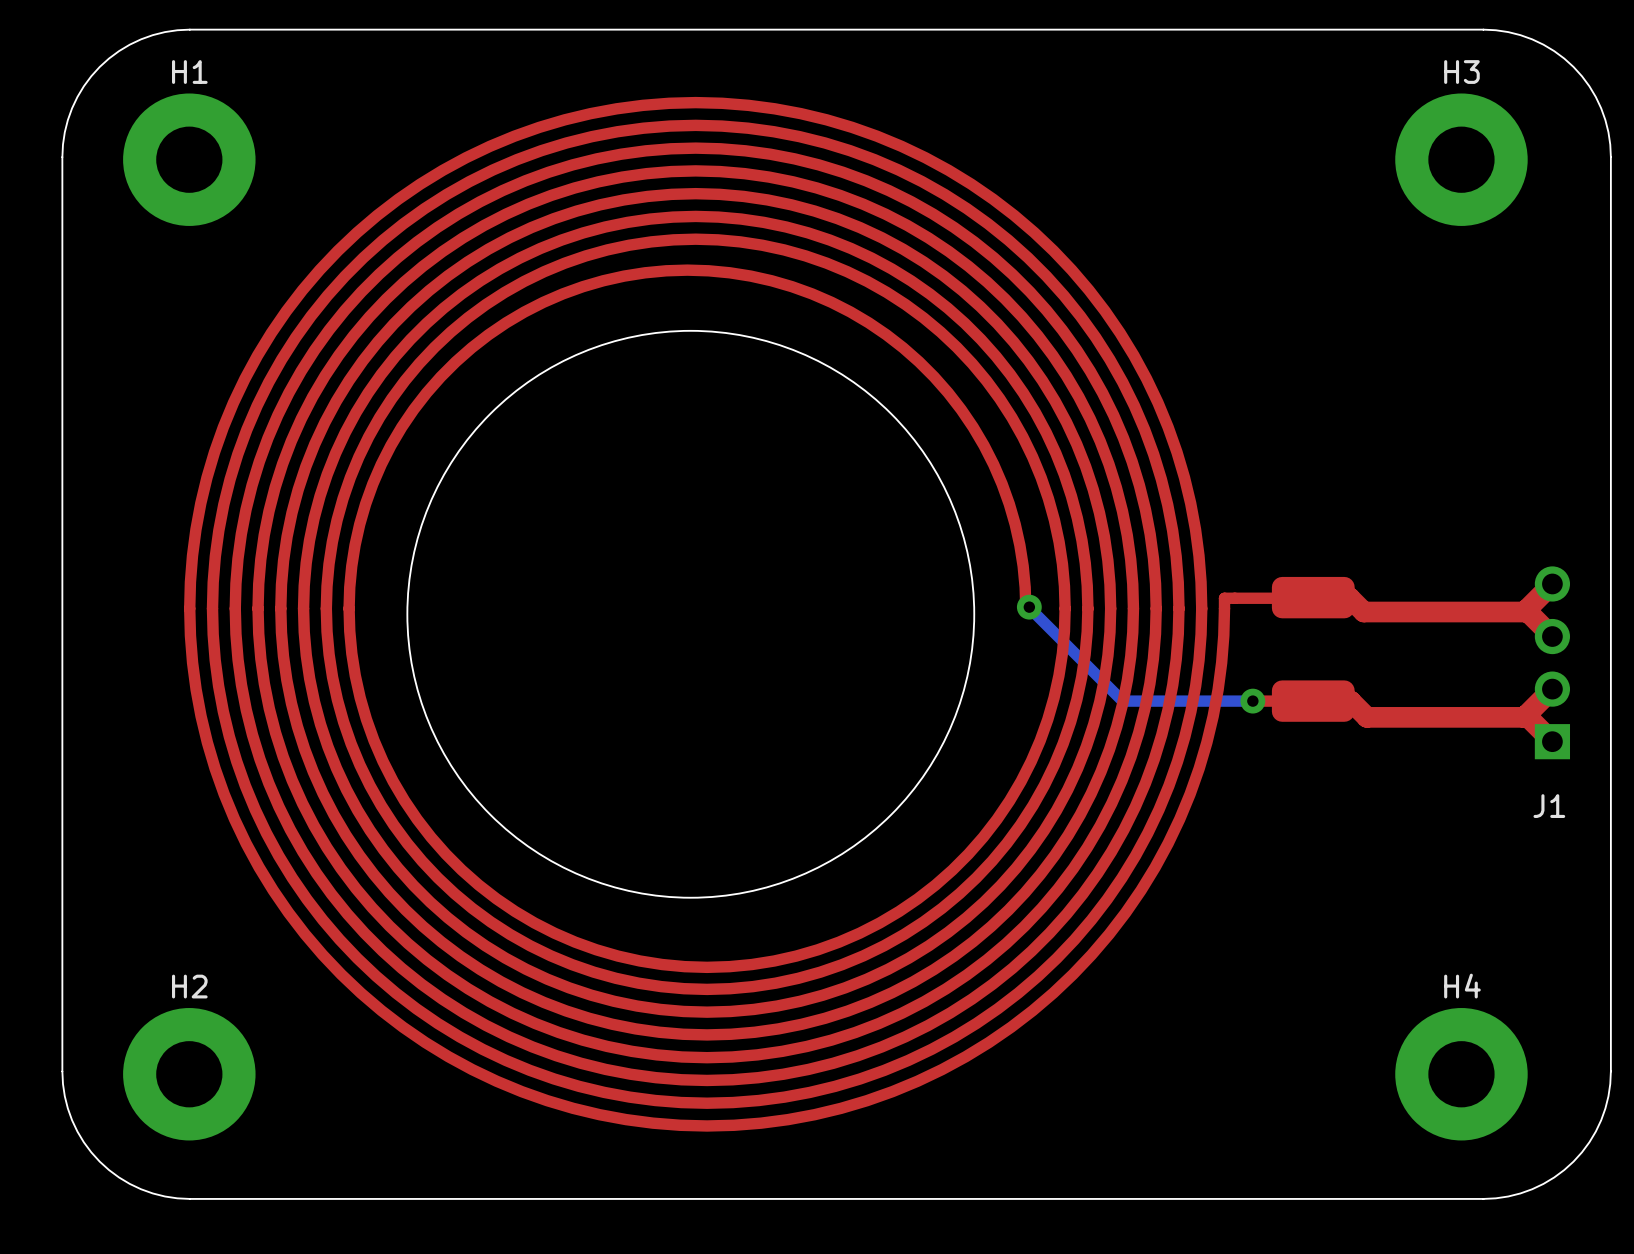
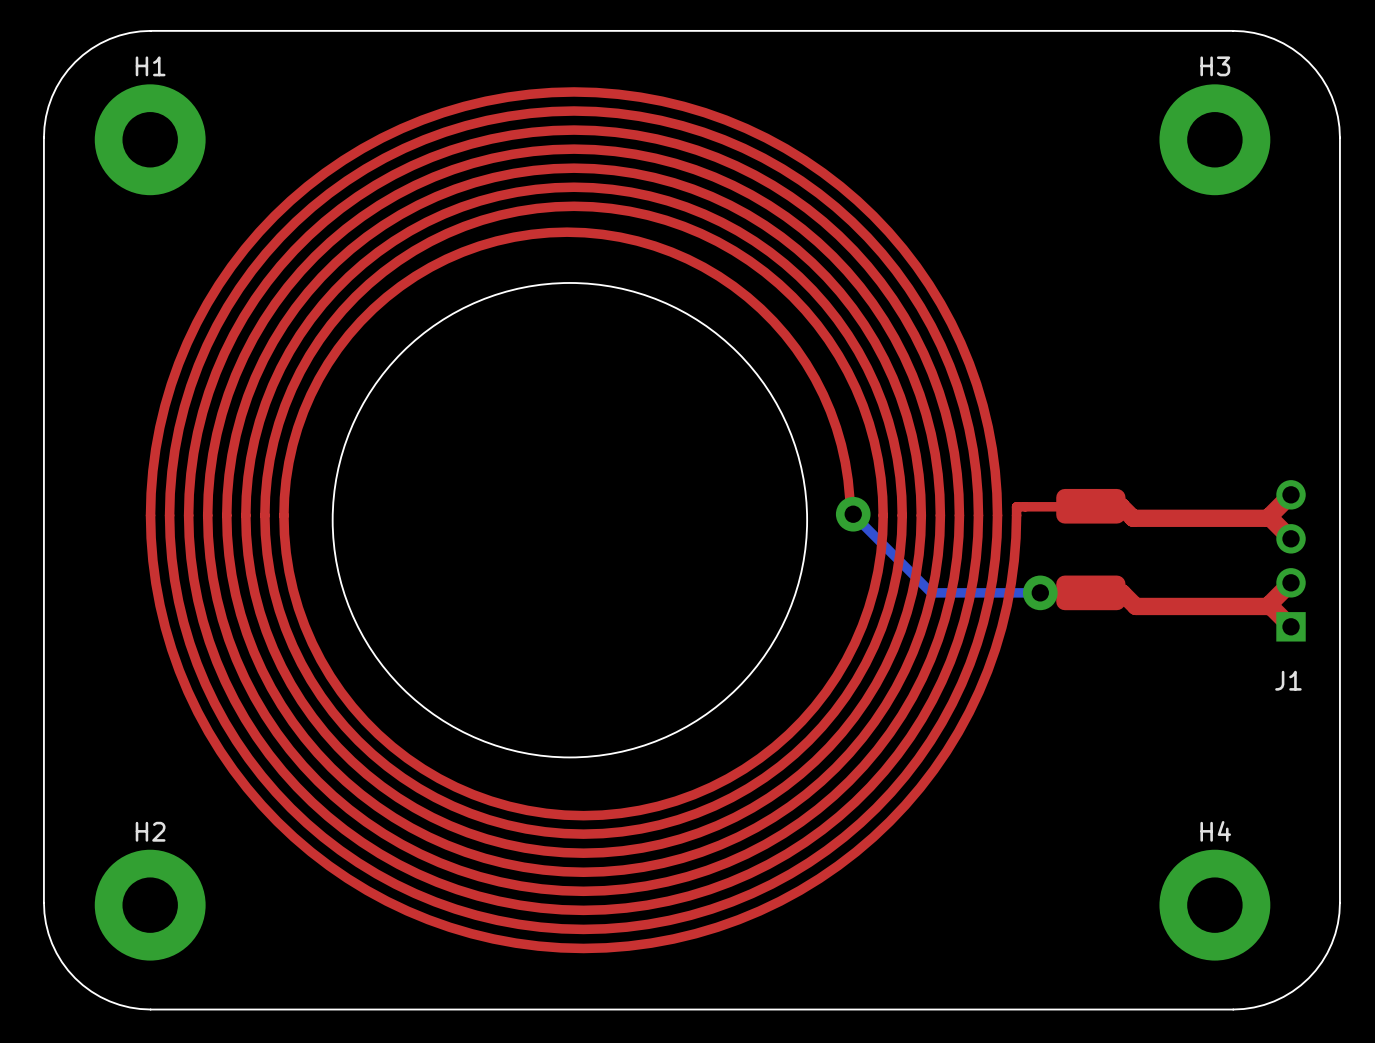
part footprint: [184, 96, 1355, 1132] -> [145, 87, 1126, 954]

